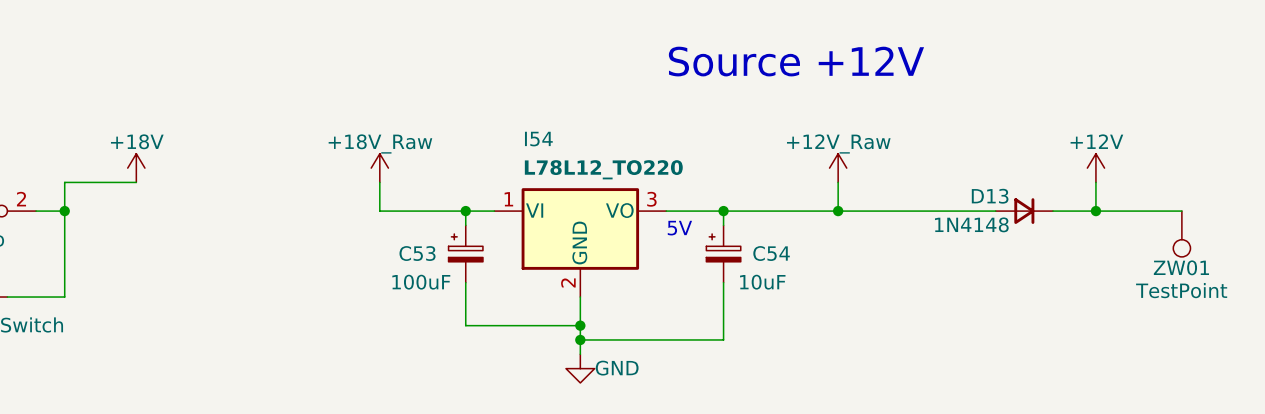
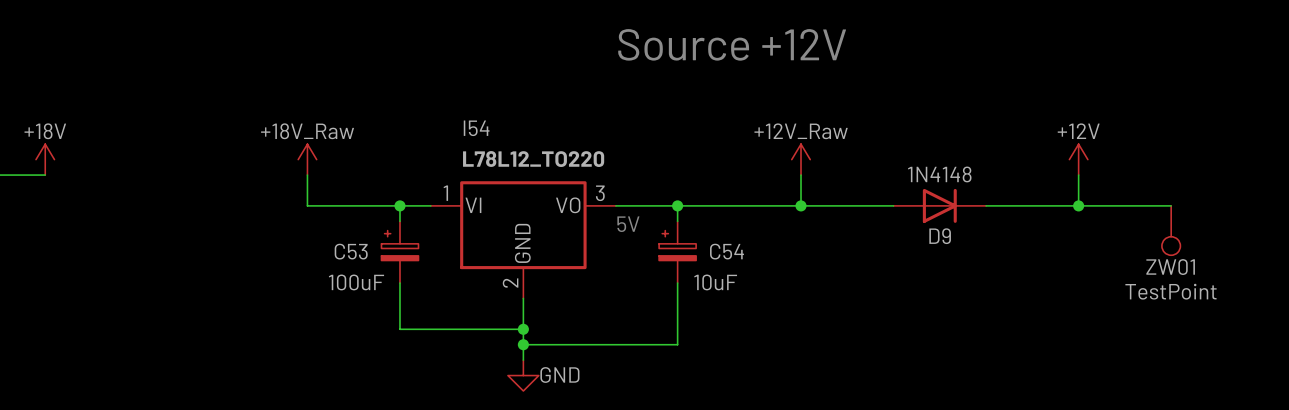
D9: none -> 1N4148 (939, 205)
D13: 1N4148 (1024, 211) -> none

